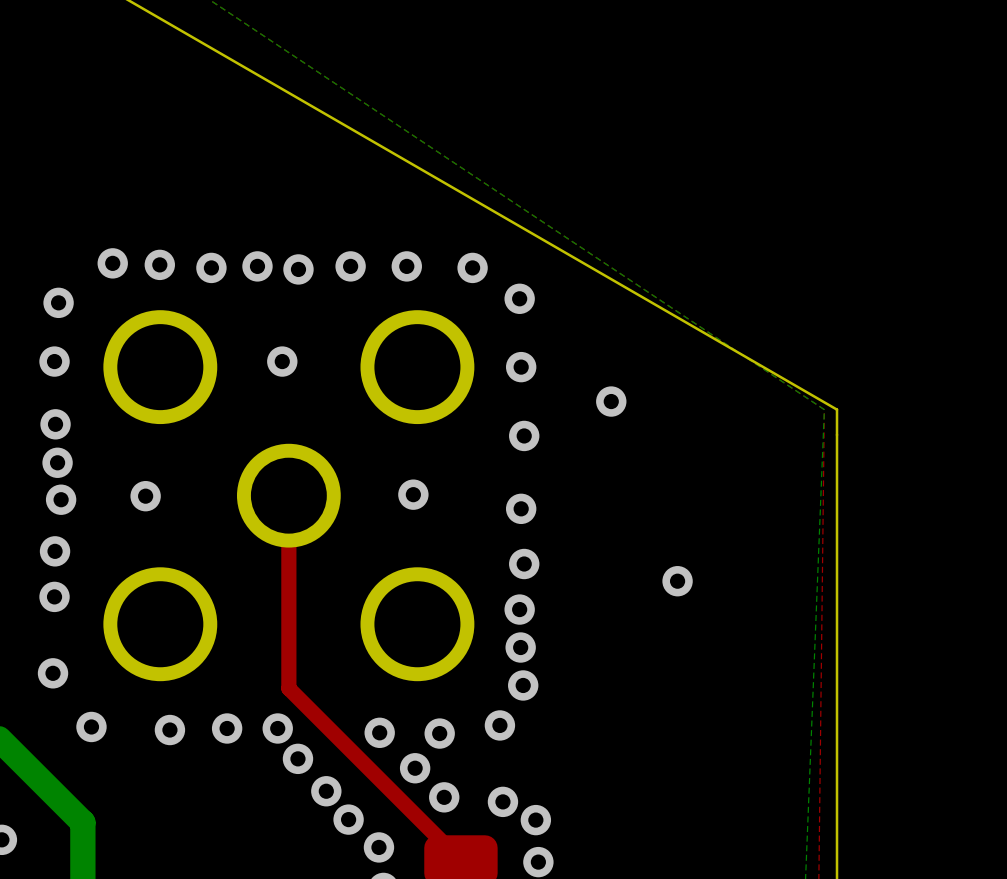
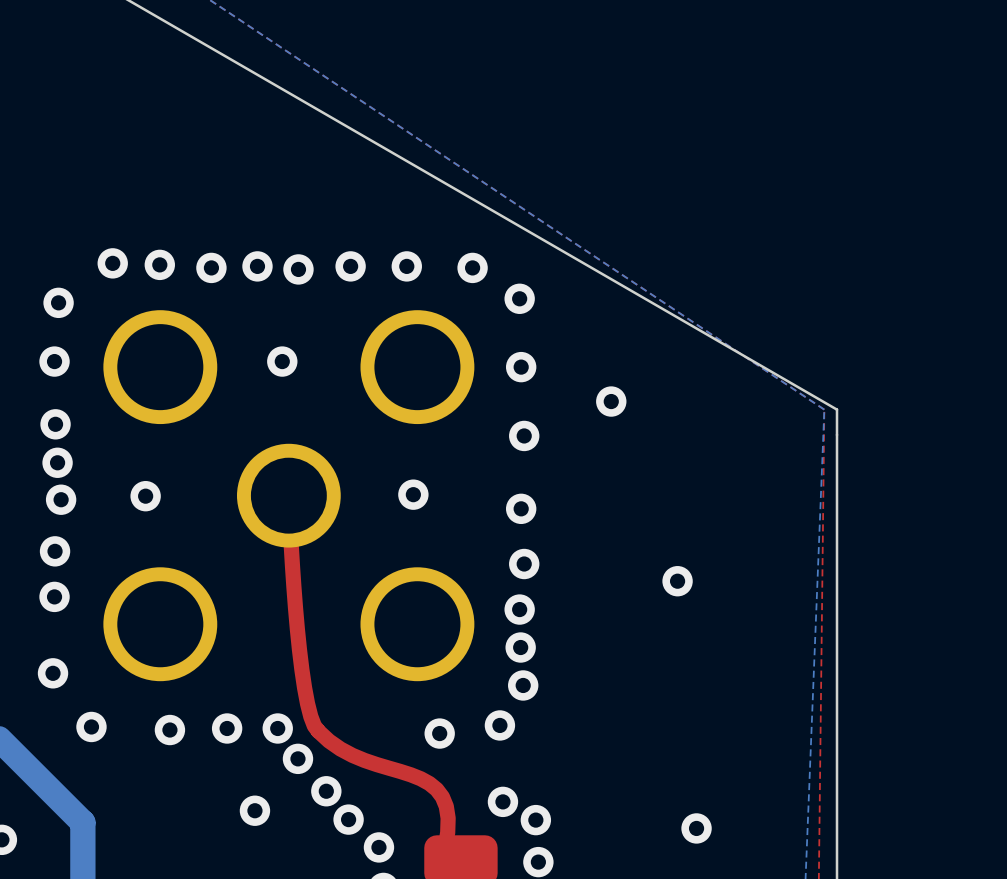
top track: (288, 495) (288, 688) (460, 860) -> (288, 495) (299, 649) (307, 703) (314, 725) (329, 741) (352, 755) (420, 778) (436, 789) (446, 806) (448, 818) (444, 849)
via: (379, 732) -> none
via: (415, 768) -> none
via: (444, 797) -> none
via: none -> (254, 810)
via: none -> (696, 828)

